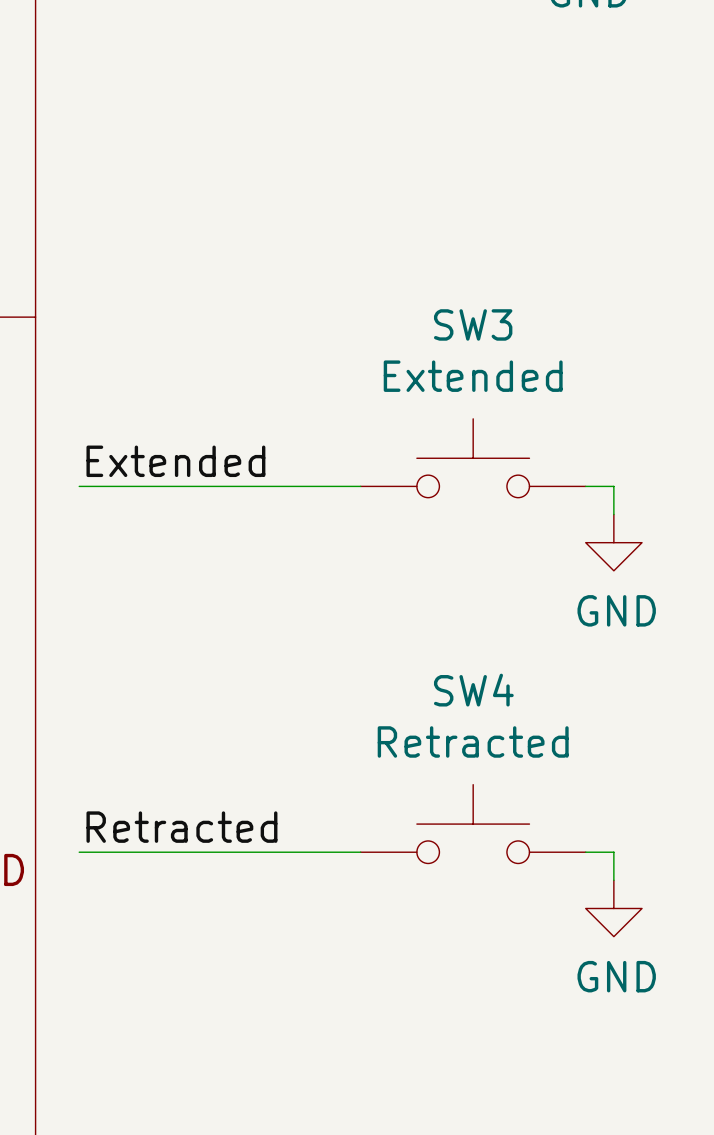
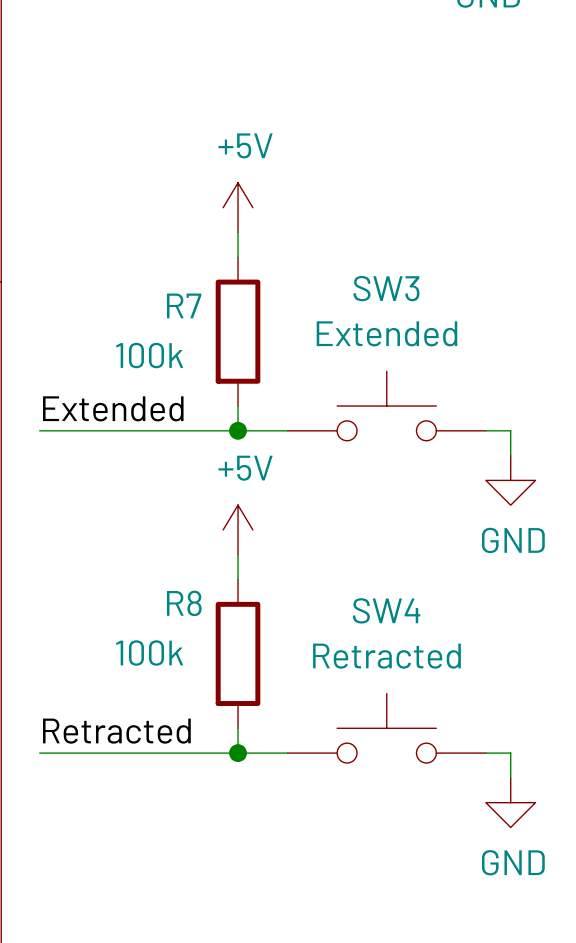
power symbol: none -> +5V (238, 207)
wire: none -> (238, 232) (238, 257)
R7: none -> 100k (238, 331)
wire: none -> (238, 406) (238, 430)
junction: none -> (238, 430)
power symbol: none -> +5V (238, 529)
wire: none -> (238, 554) (238, 579)
R8: none -> 100k (238, 653)
wire: none -> (238, 728) (238, 753)
junction: none -> (238, 753)

